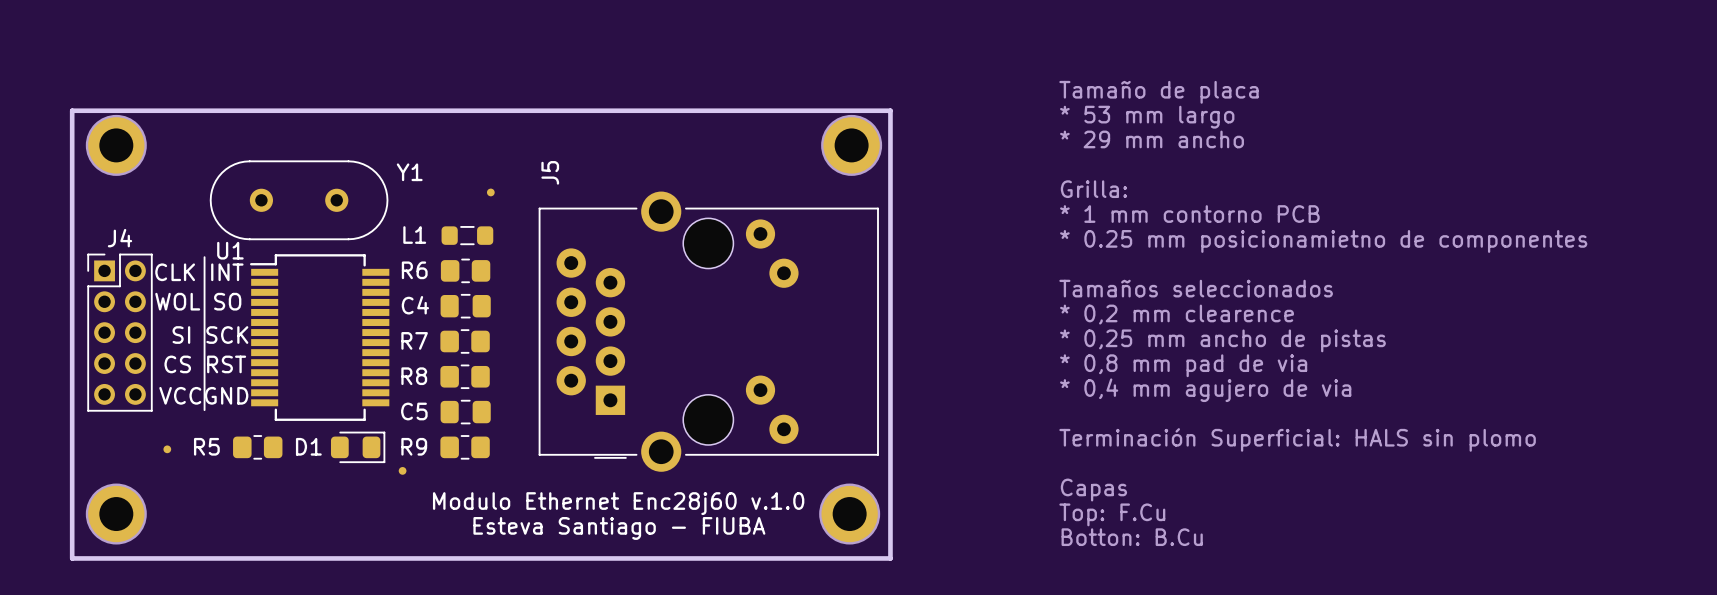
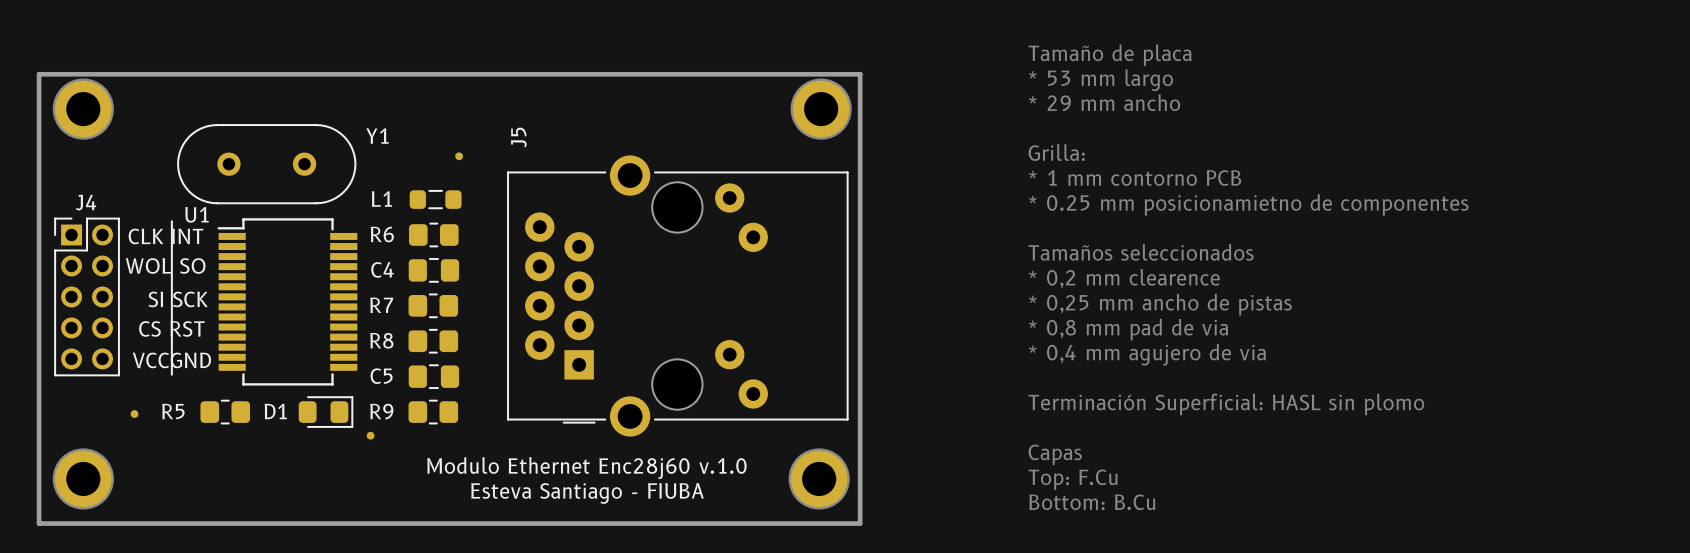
text: Terminación Superficial: HALS sin plomo (1297, 439) -> Terminación Superficial: HASL sin plomo (1226, 404)
text: Botton: B.Cu (1132, 537) -> Bottom: B.Cu (1092, 502)

